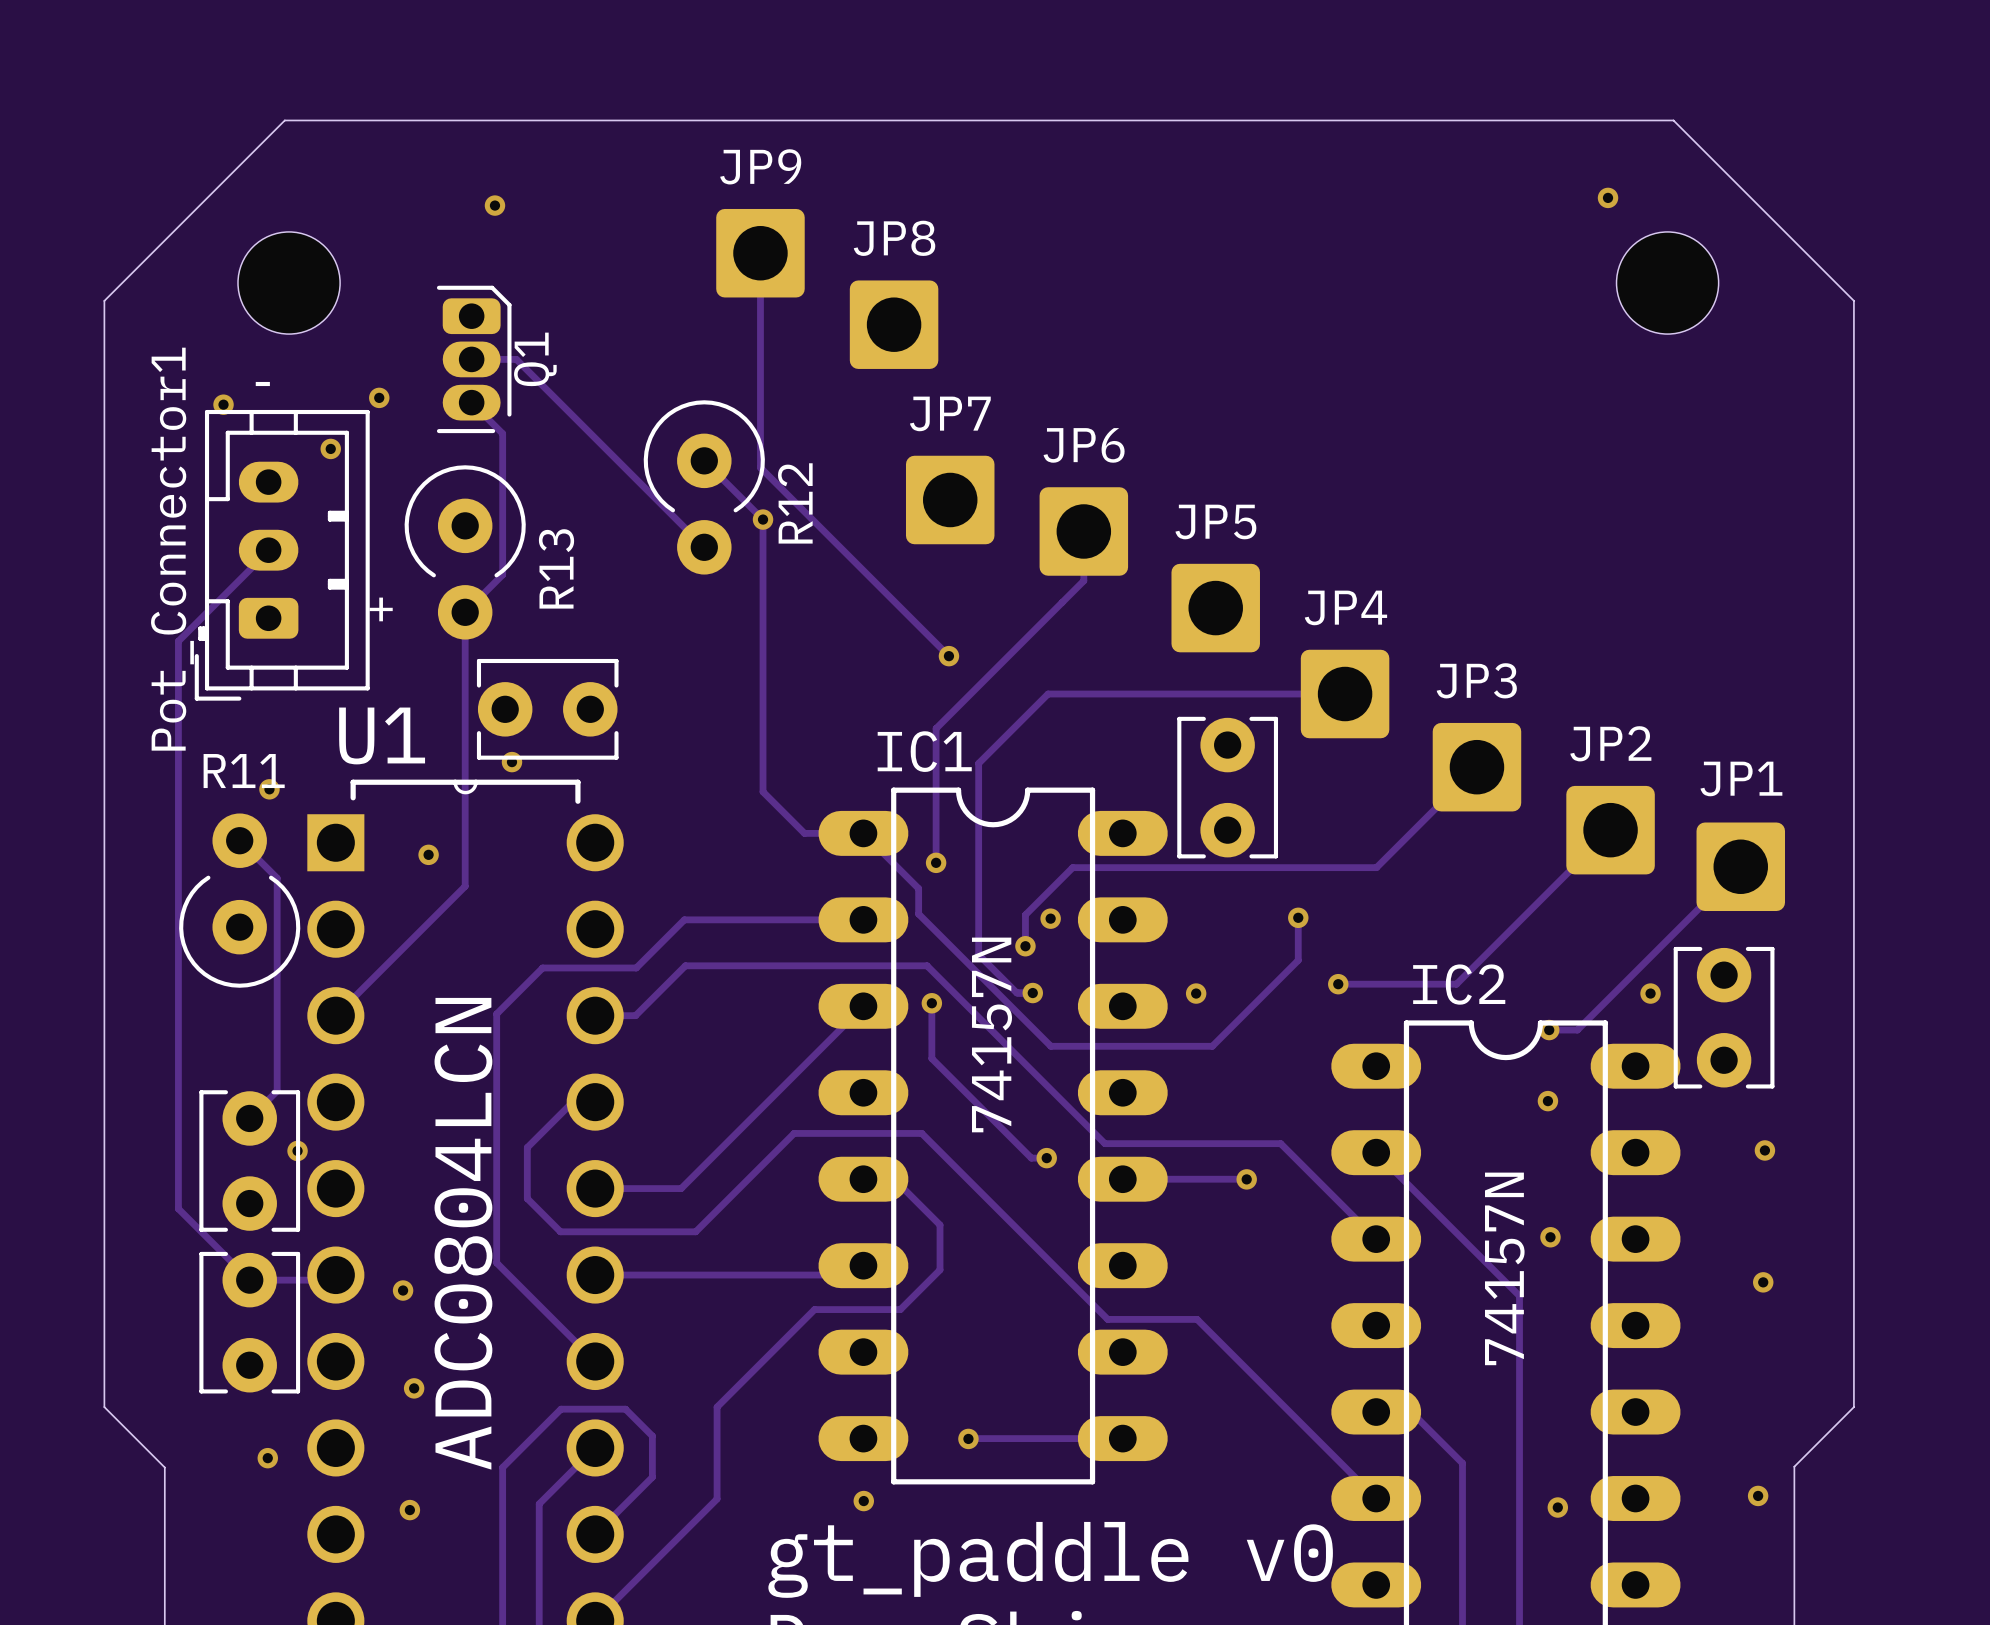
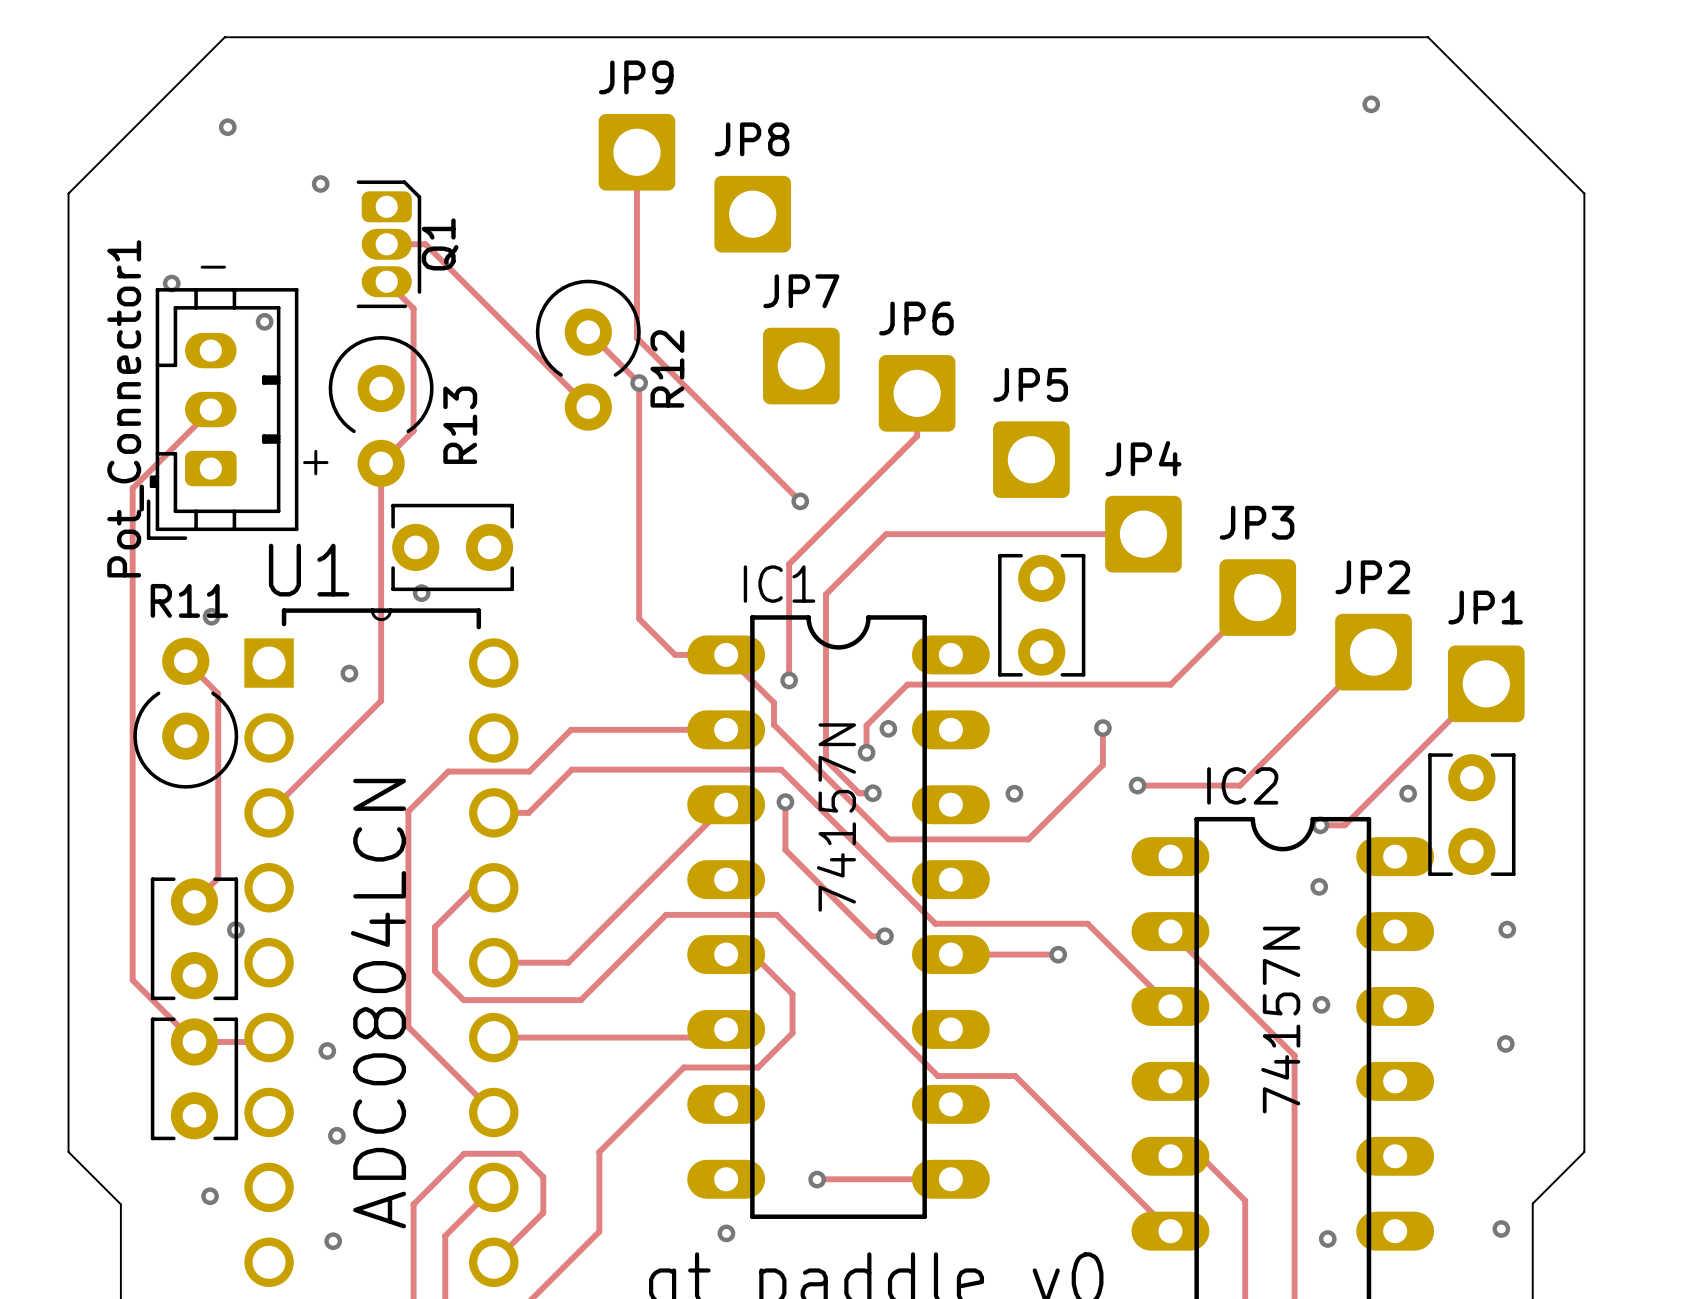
via: (494, 205) -> none
via: none -> (227, 127)
part: (289, 283) -> none
part: (1667, 283) -> none
via: none -> (320, 183)
via: (379, 397) -> none

